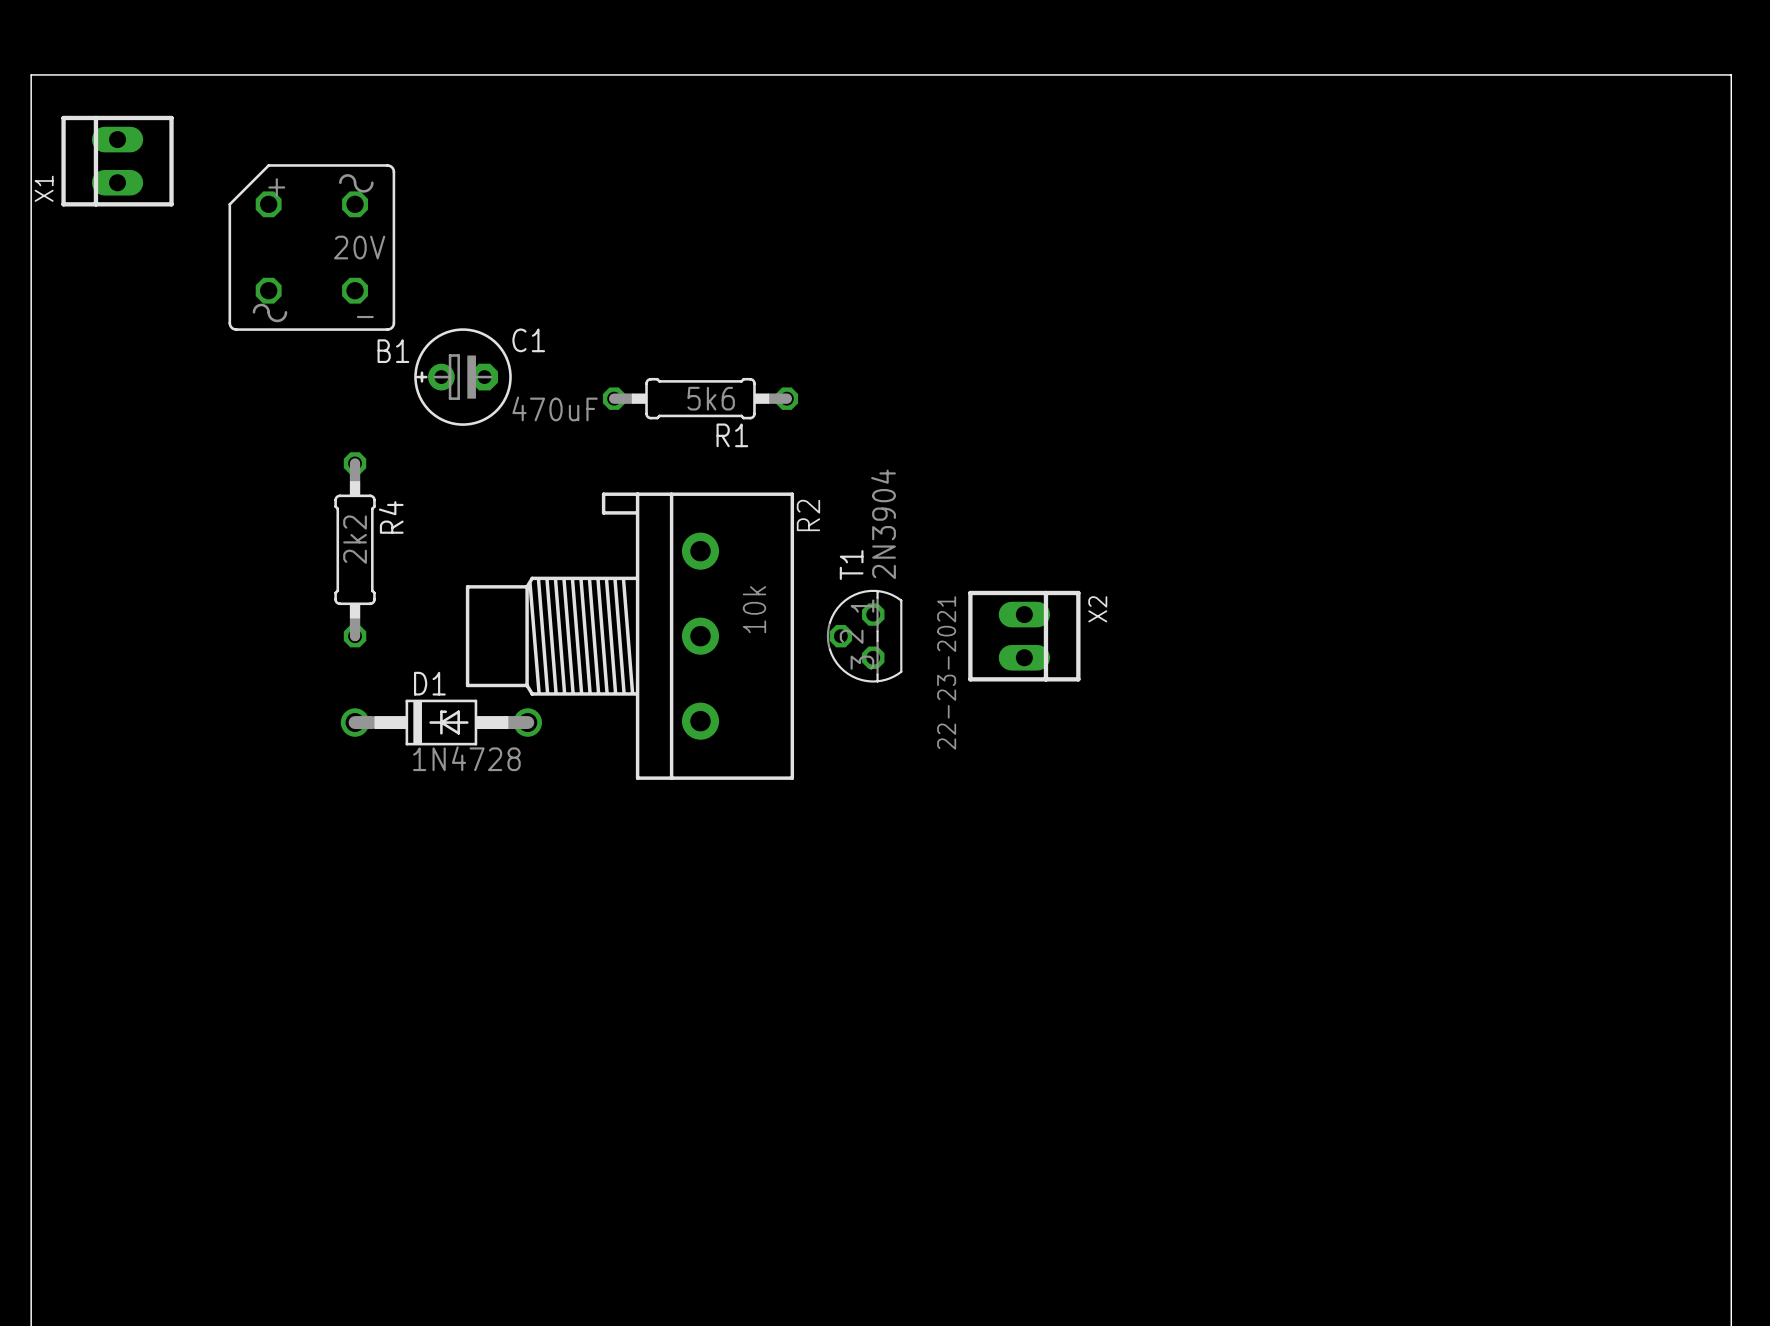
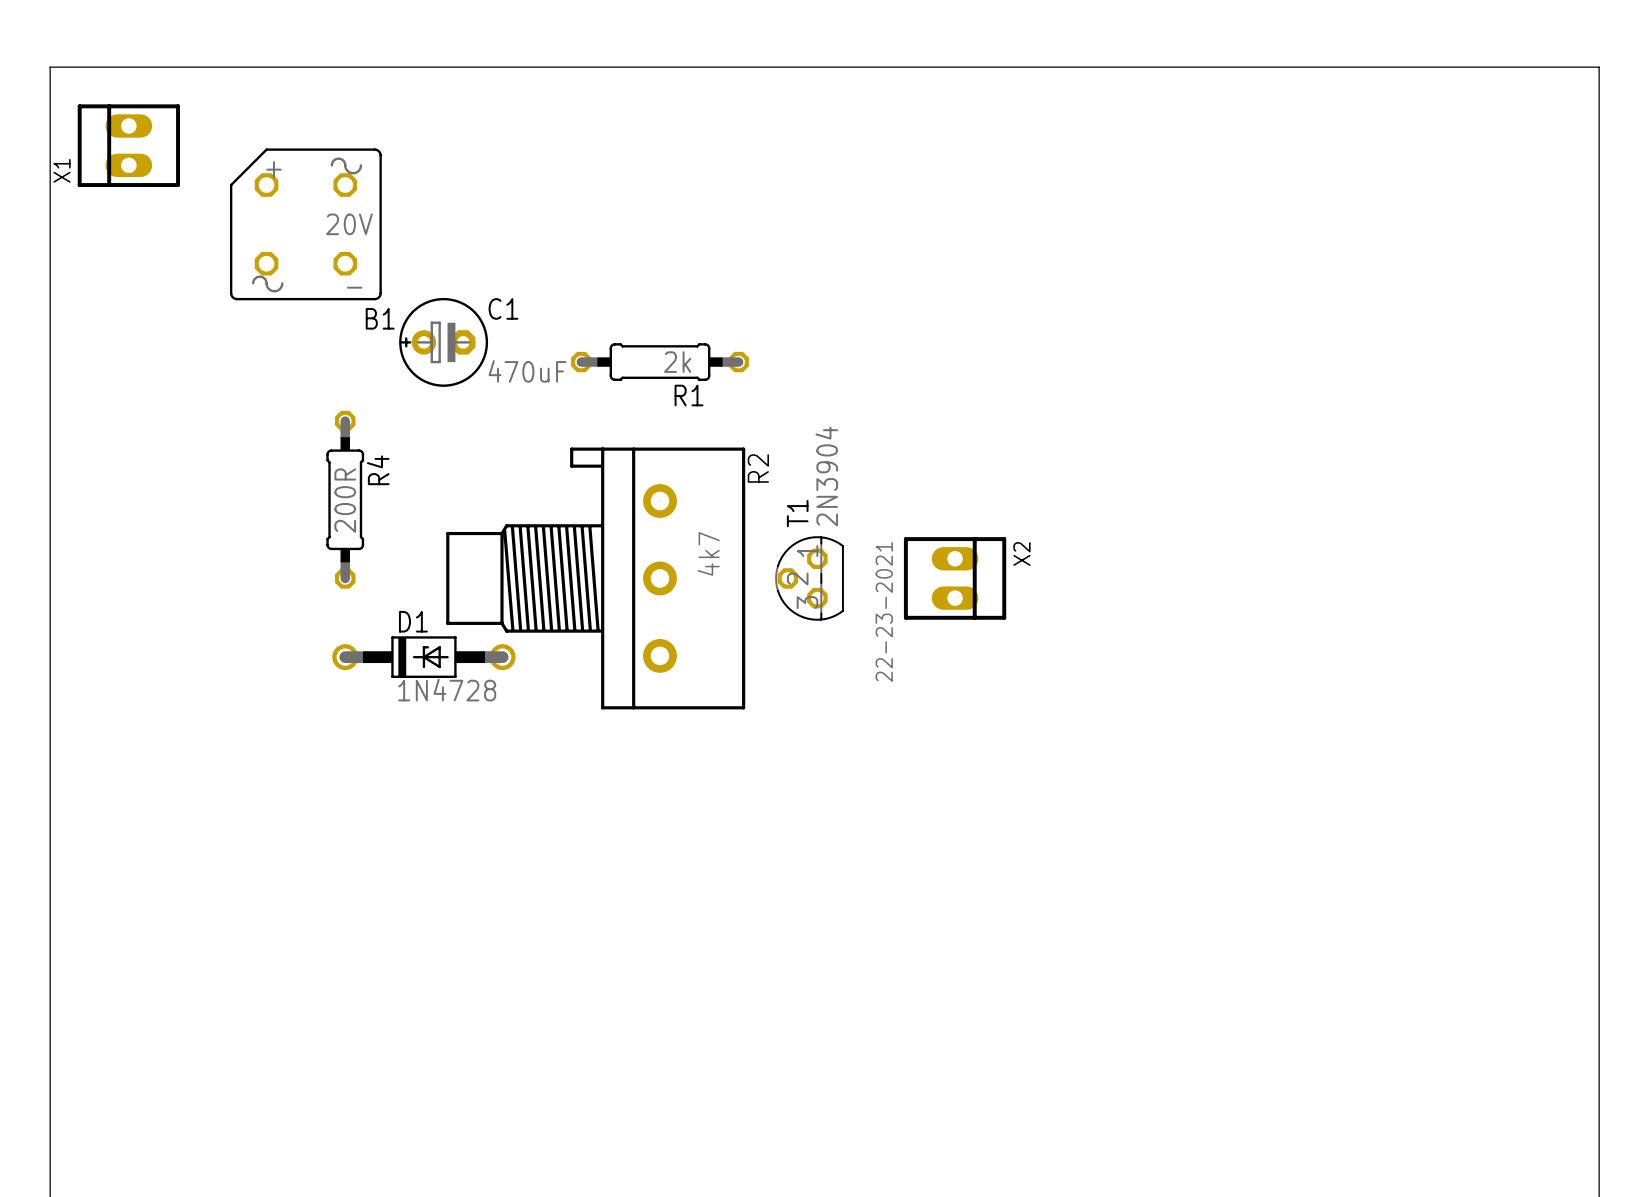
R1 value: 5k6 (711, 398) -> 2k (677, 362)
R4 value: 2k2 (355, 539) -> 200R (345, 500)
R2 value: 10k (754, 609) -> 4k7 (708, 553)

